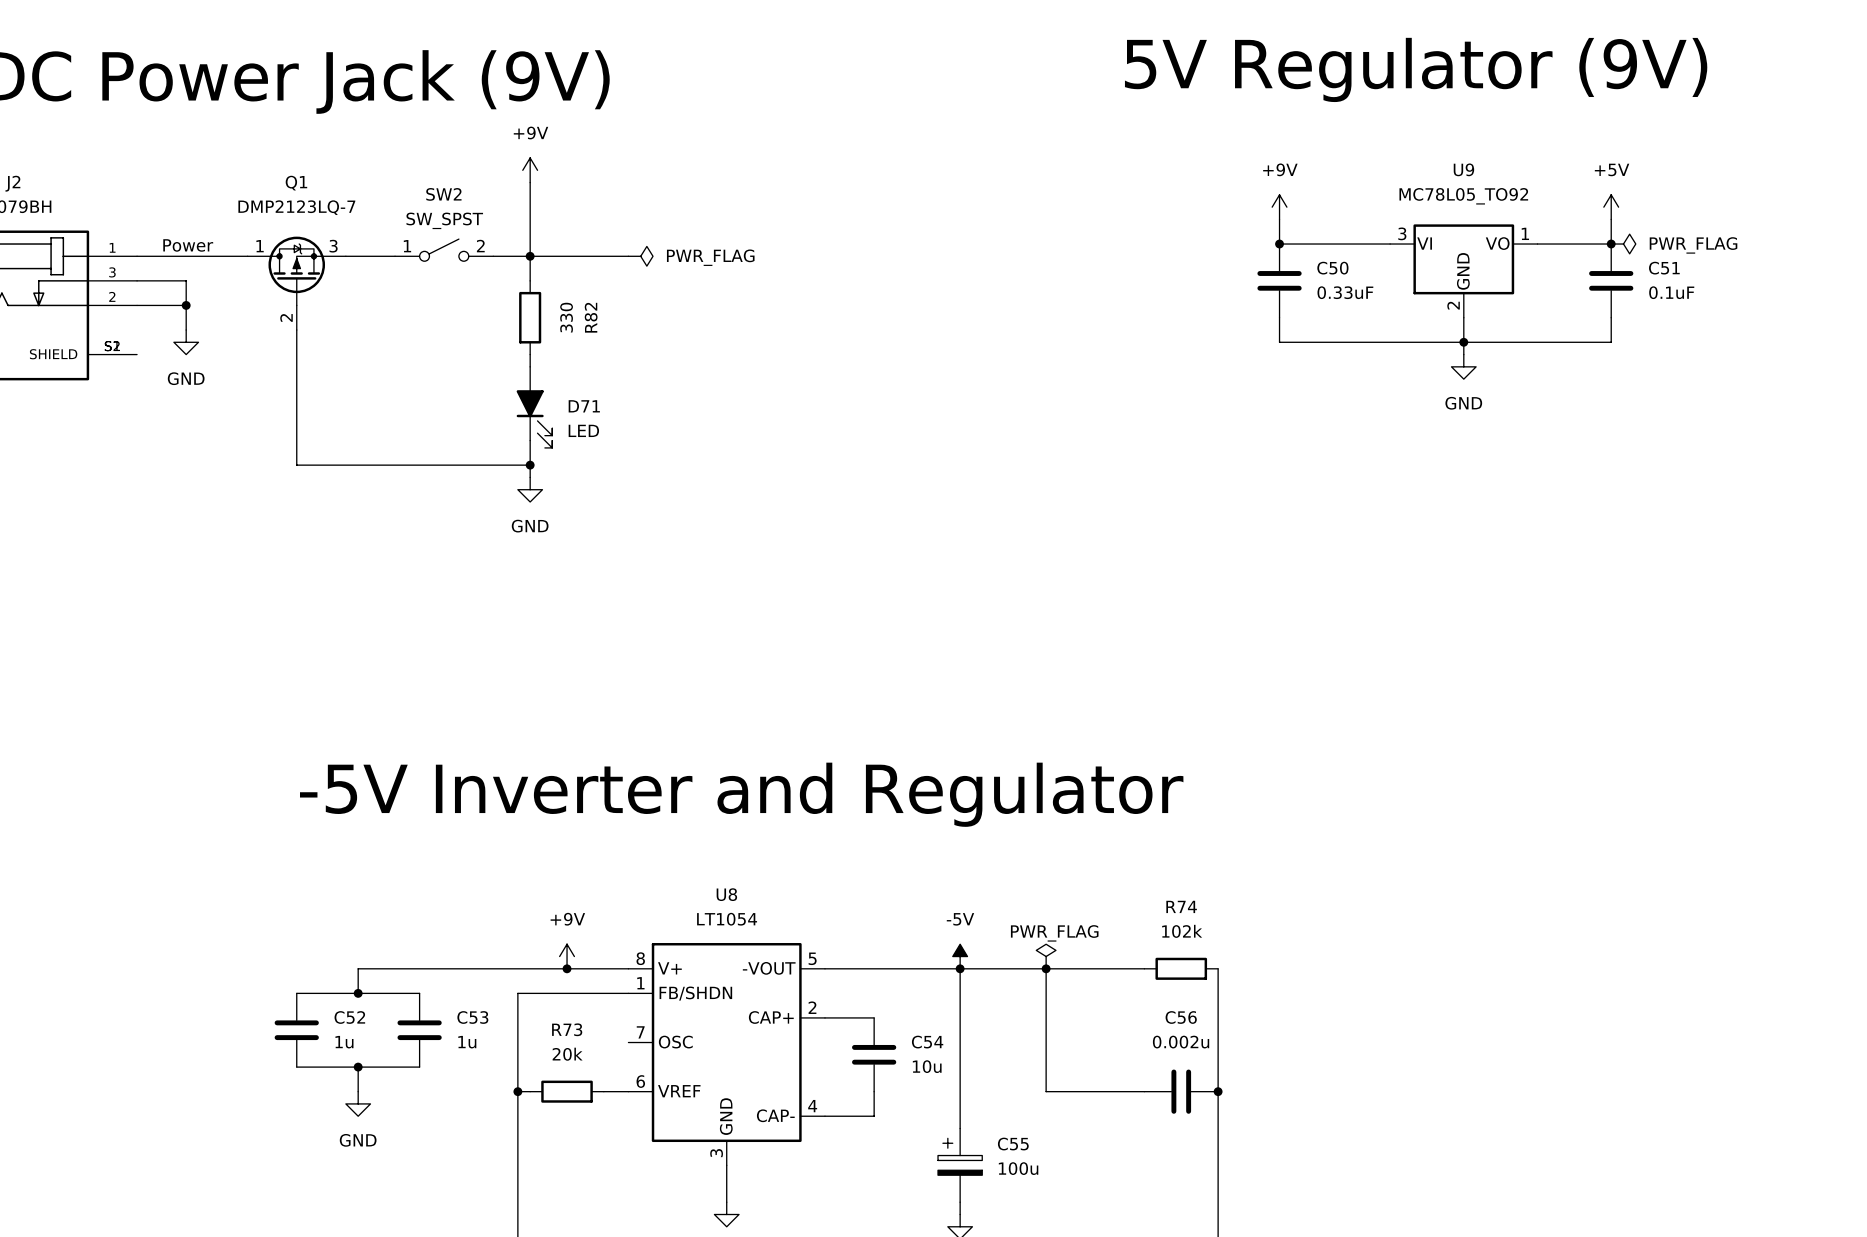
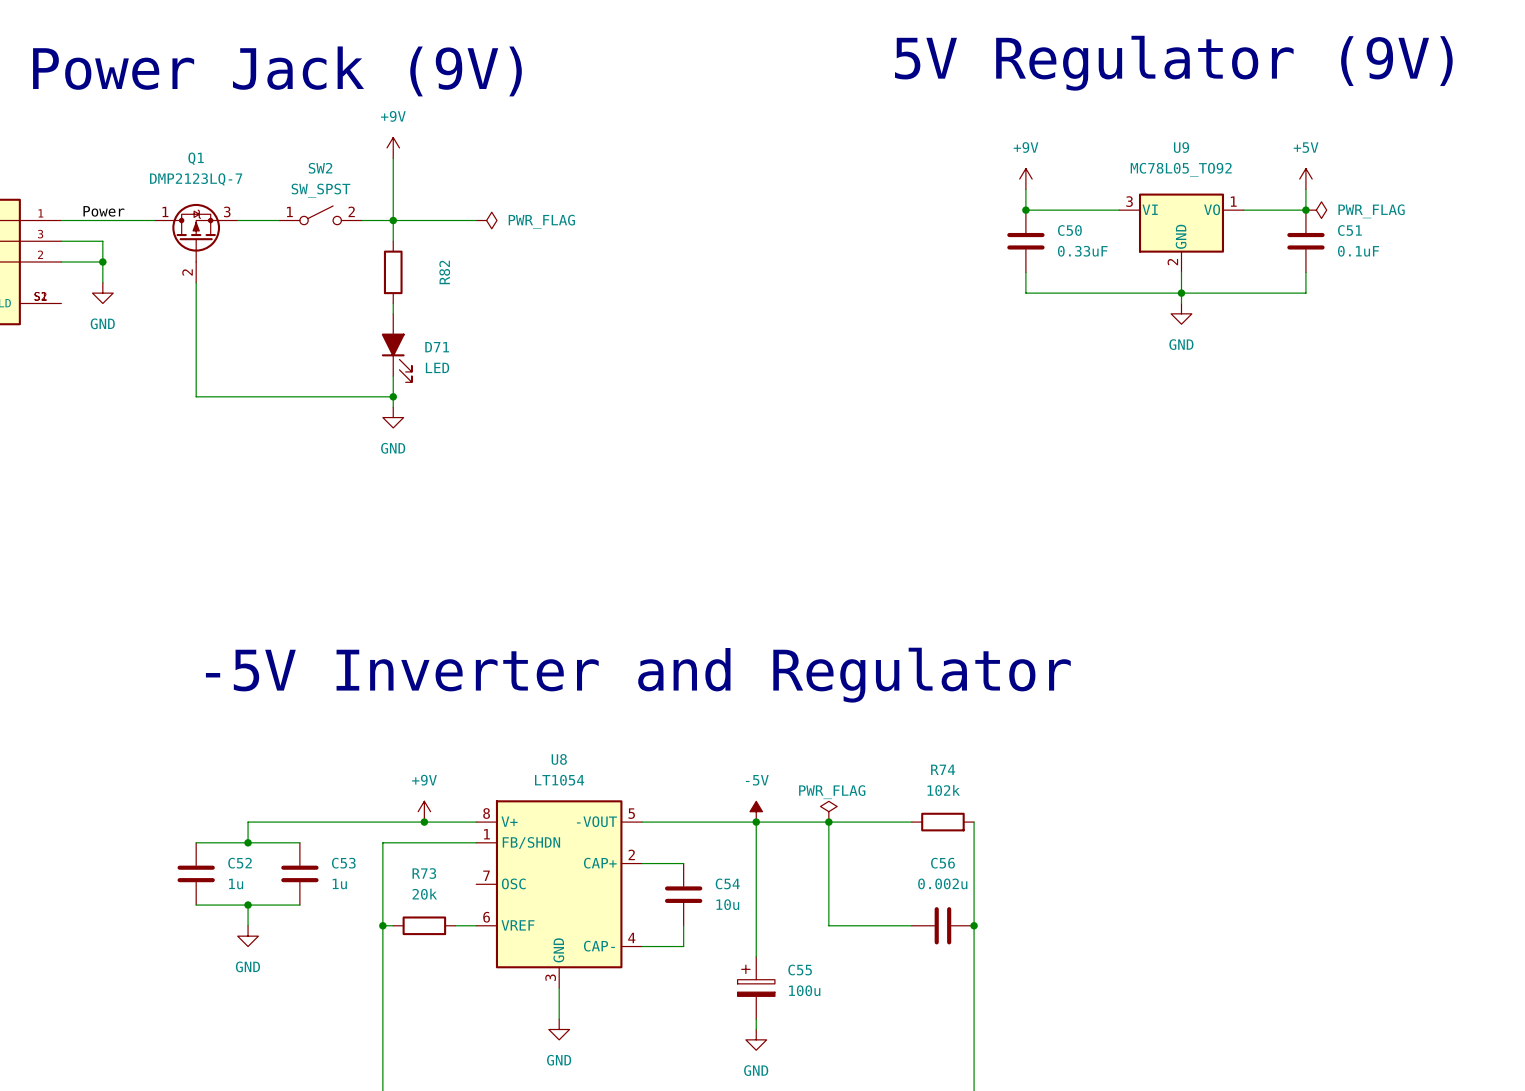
R82 value: 330 (566, 317) -> none

